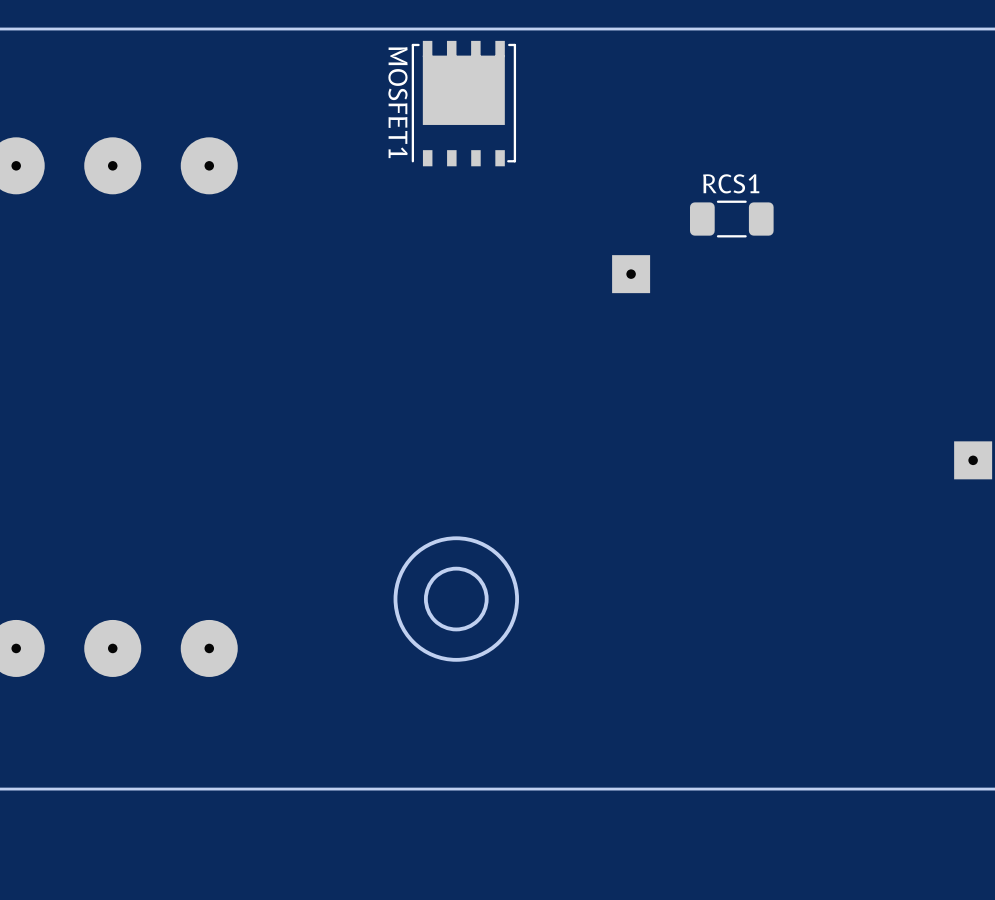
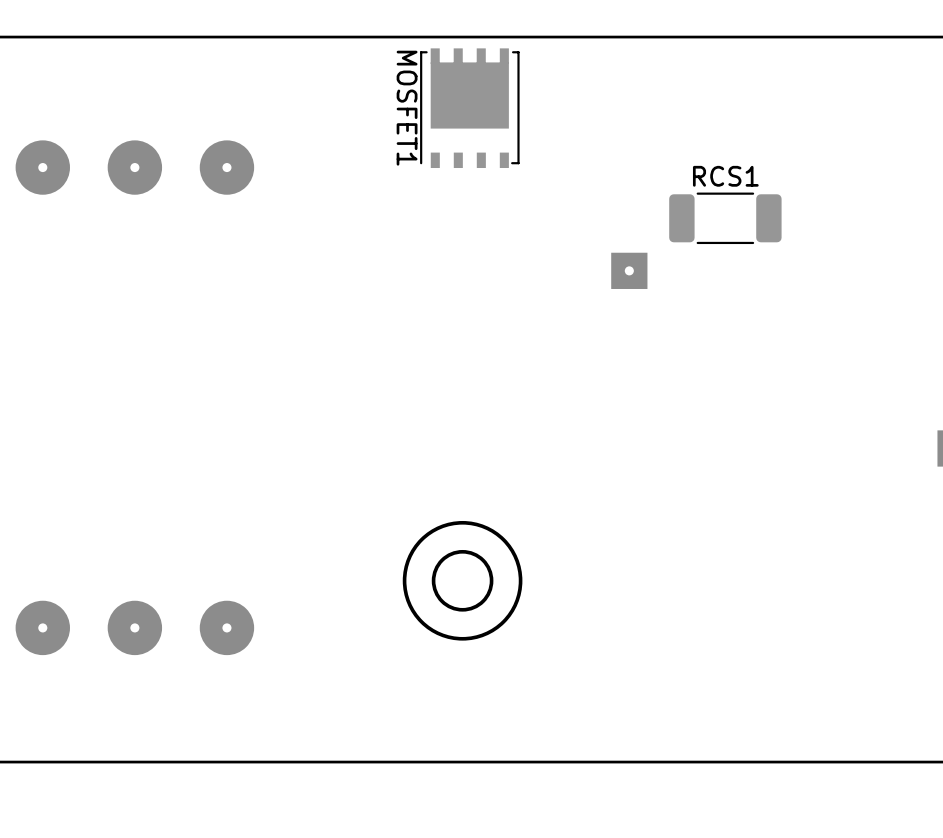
RCS1 footprint: [690, 200, 774, 238] -> [669, 192, 782, 245]

